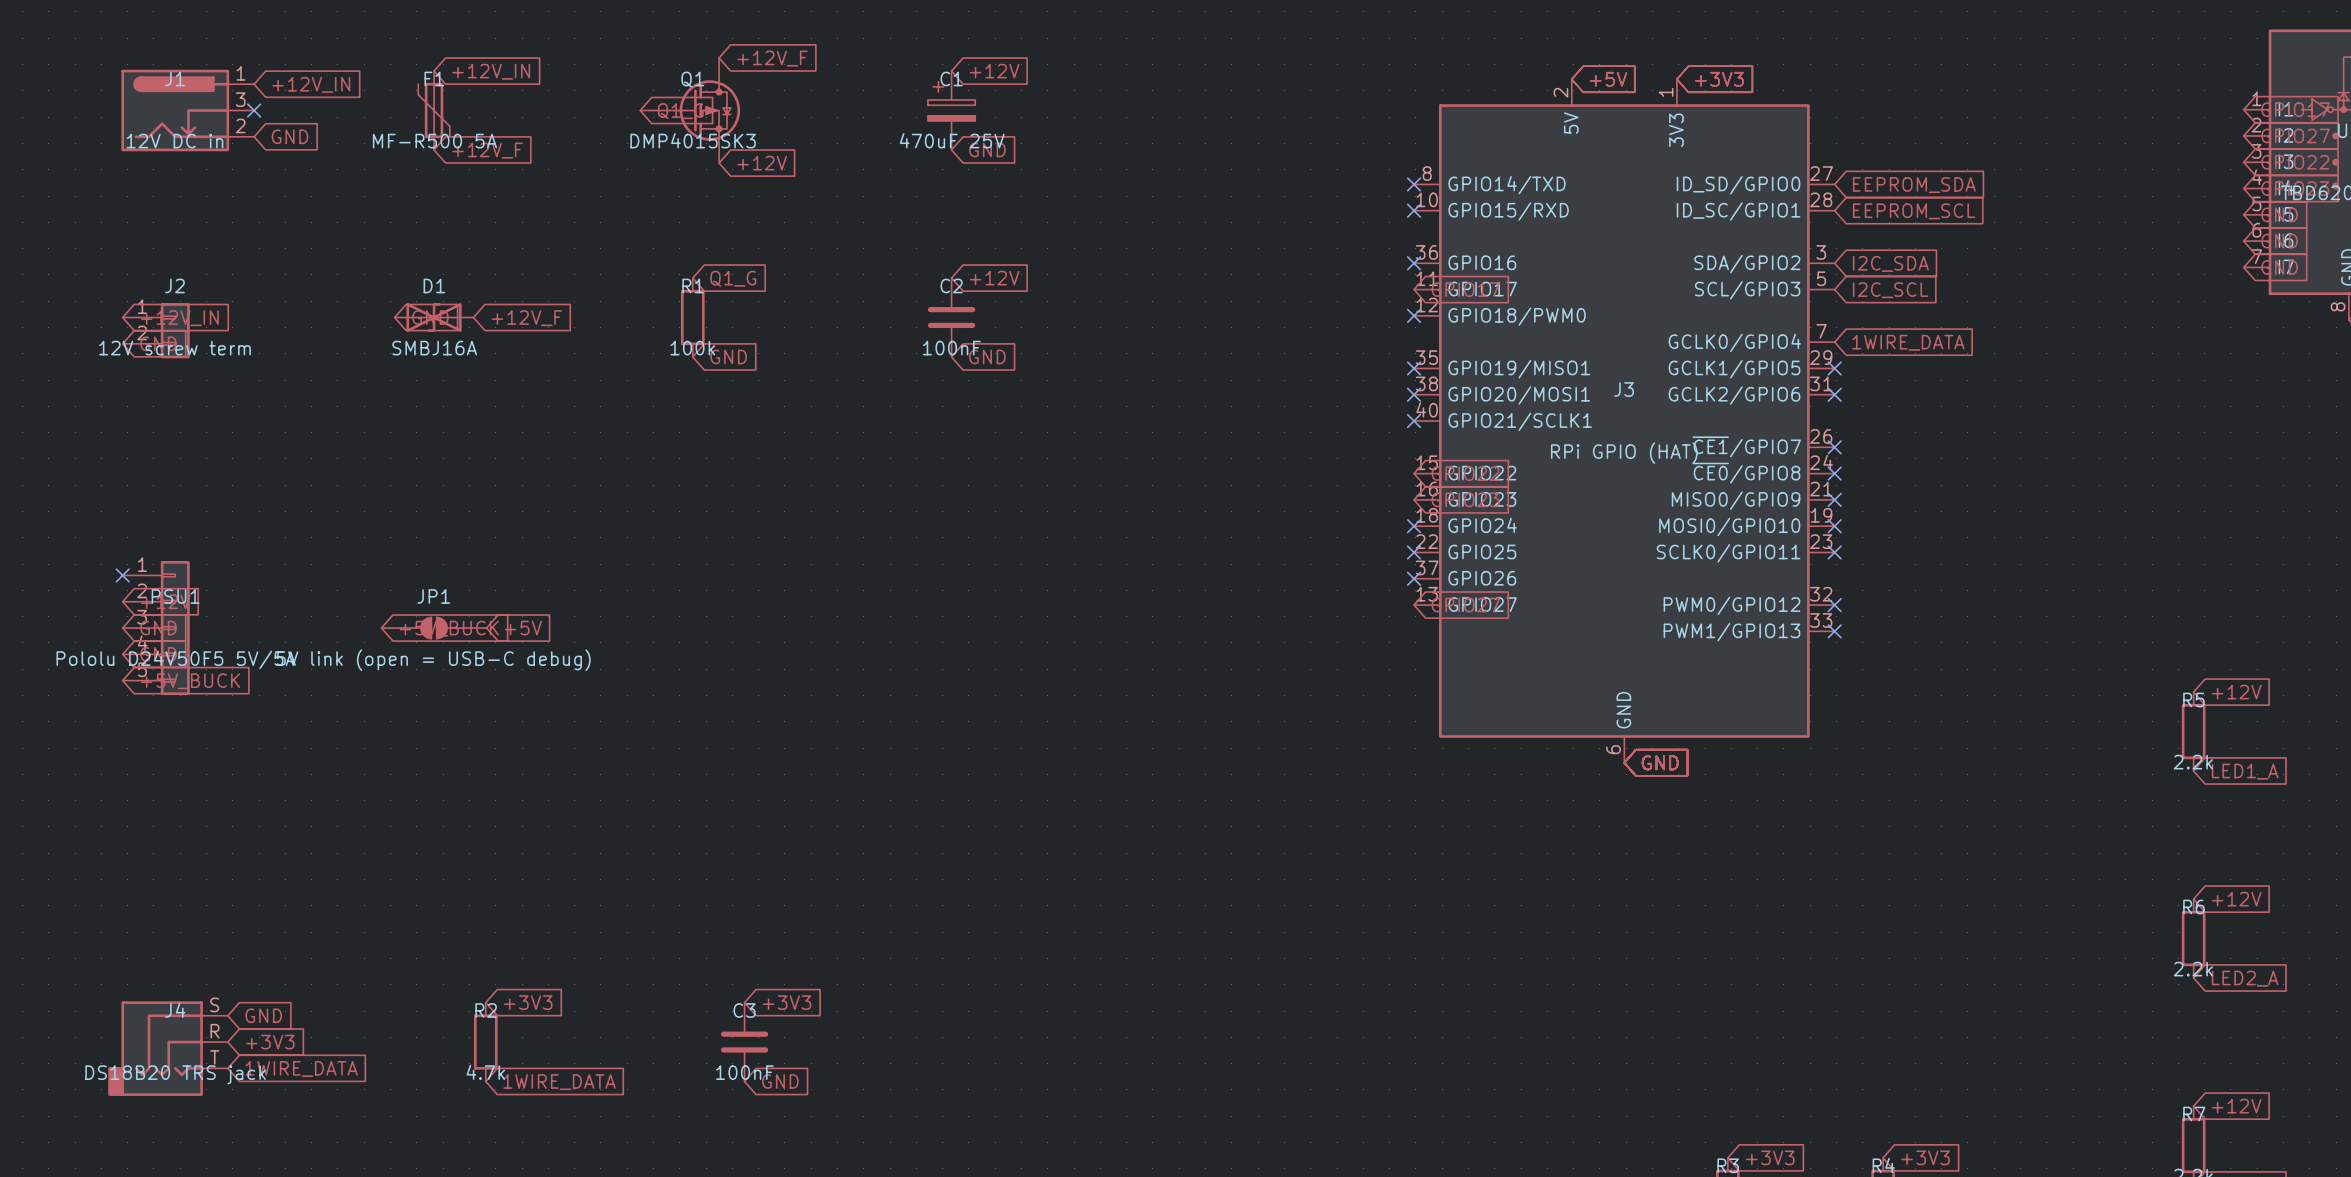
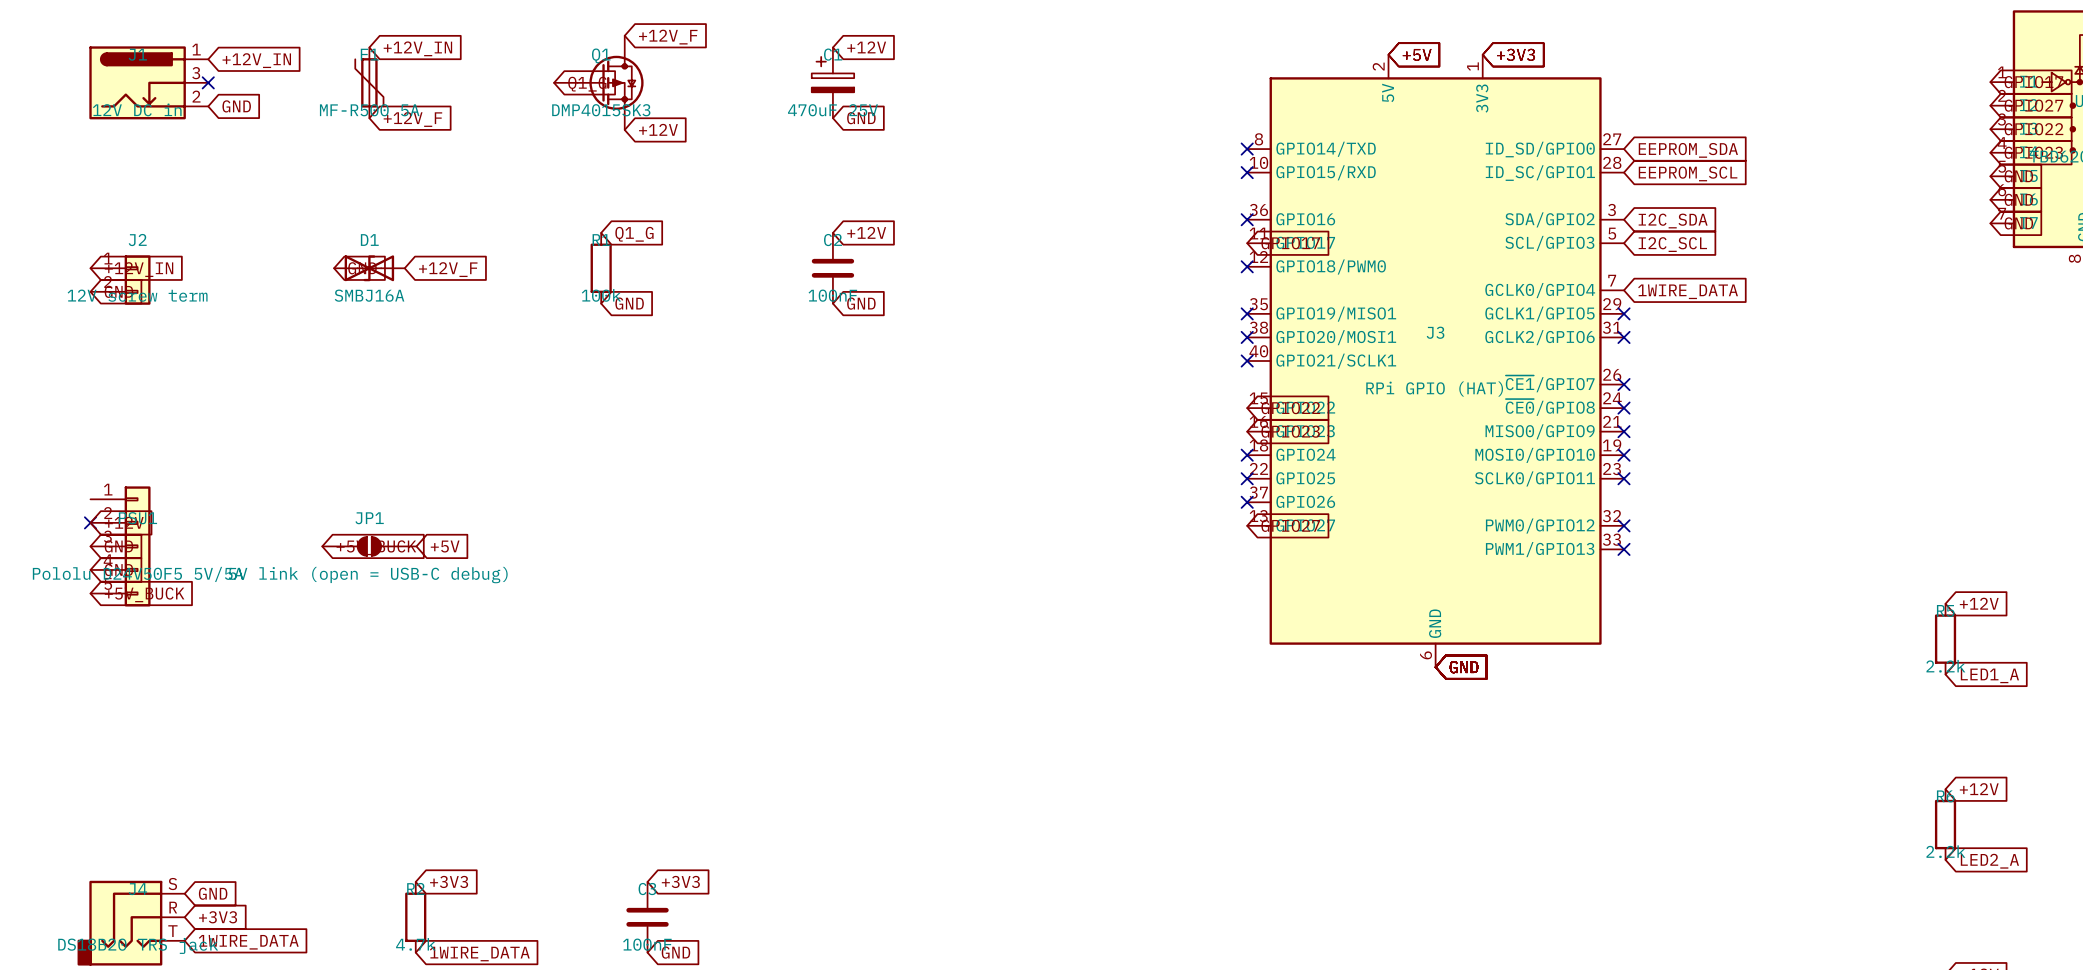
no-connect mark position: (122, 575) -> (90, 522)

